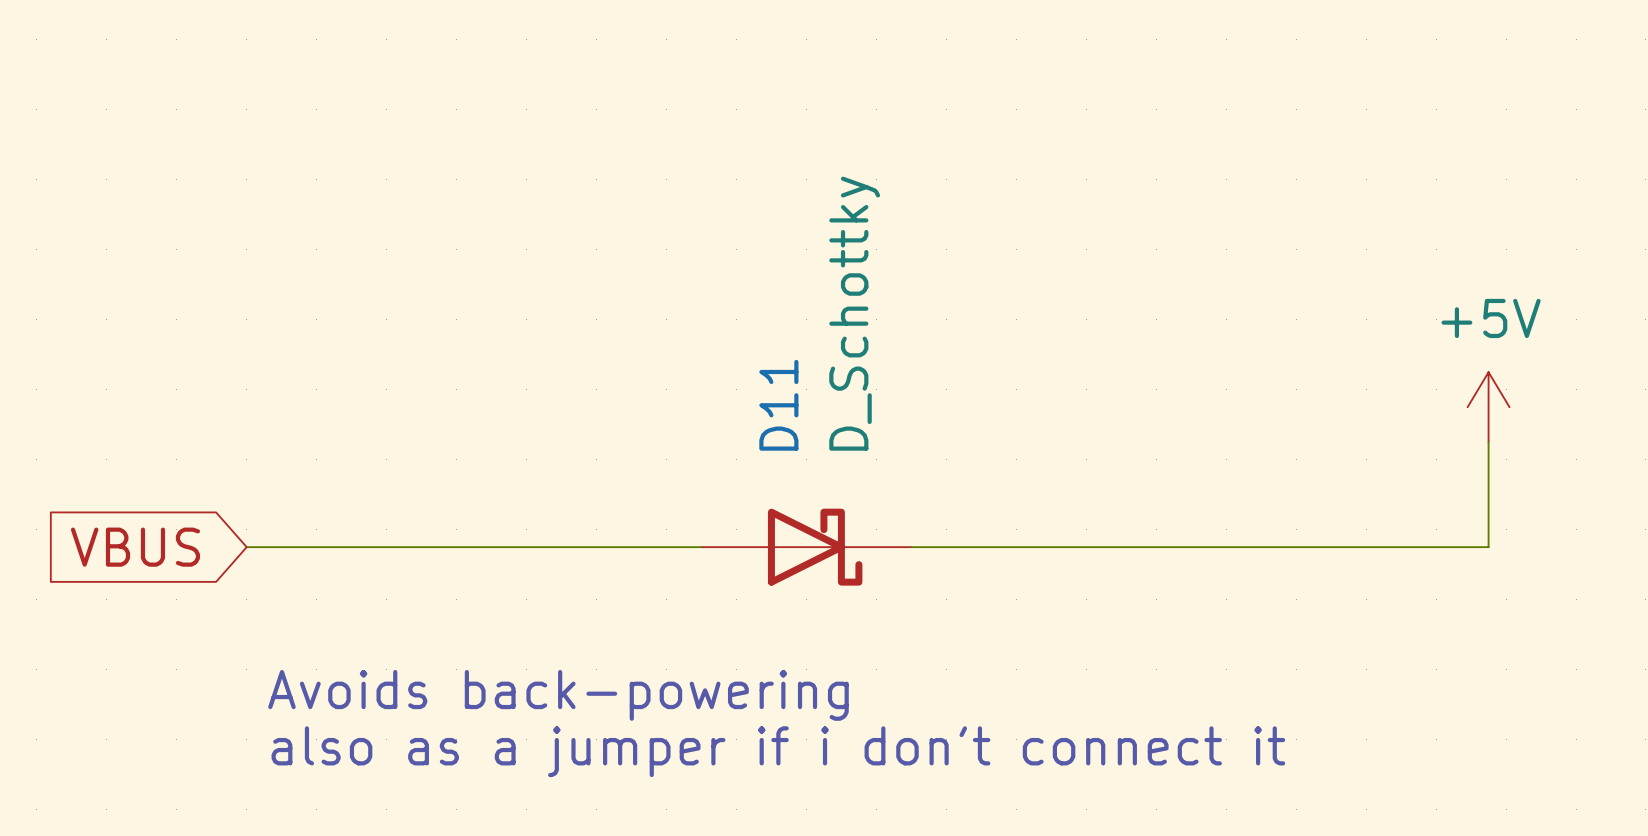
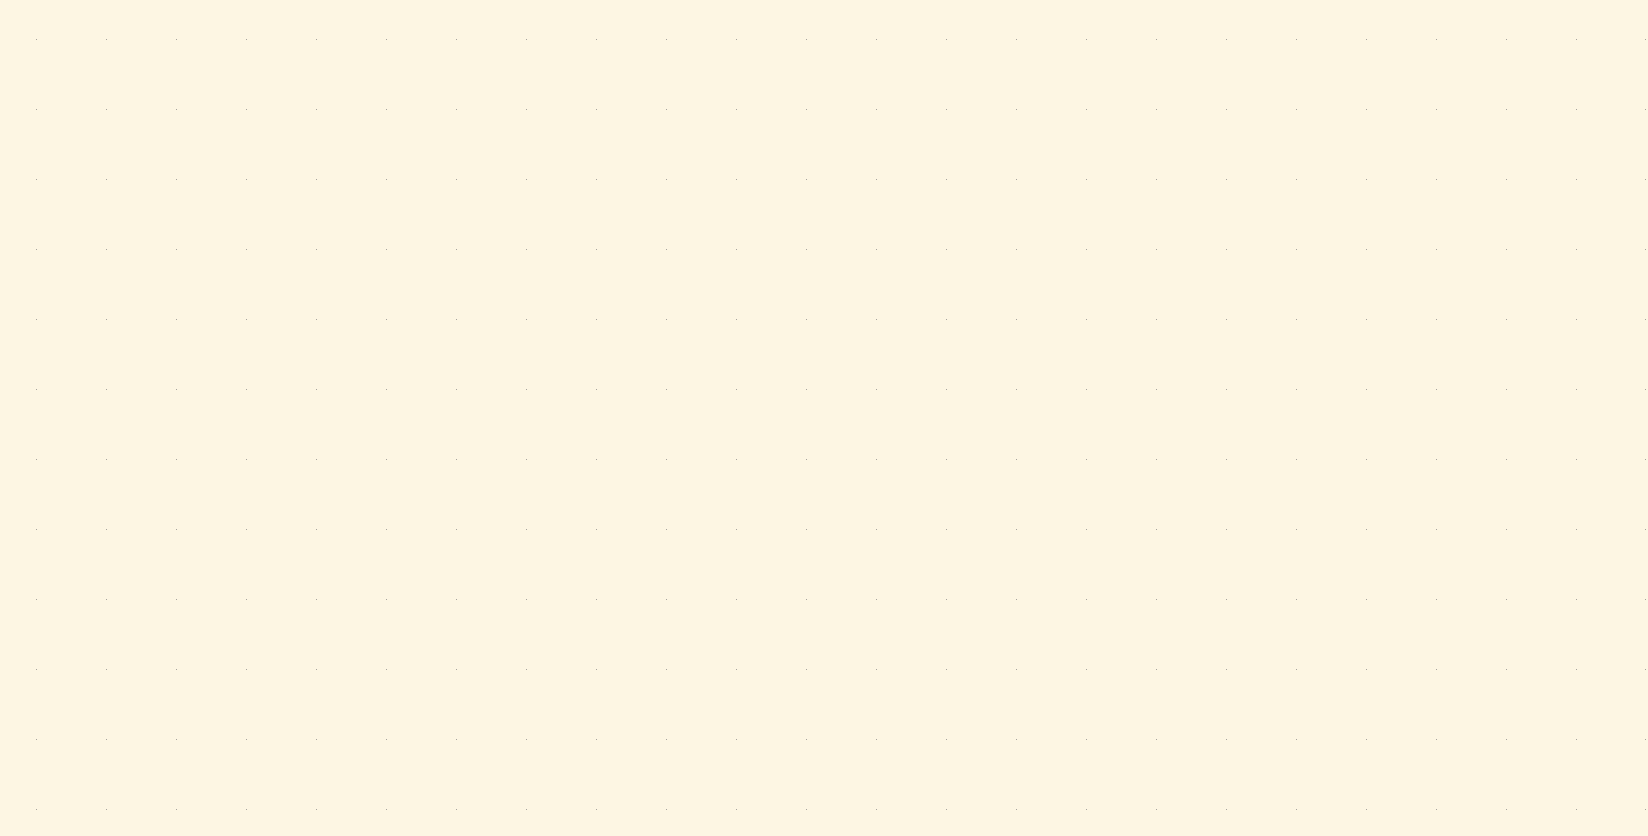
power symbol: +5V (1488, 407) -> none
wire: (1488, 442) (1488, 547) (911, 547) -> none
global label: VBUS (135, 547) -> none
wire: (246, 547) (701, 547) -> none
D11: D_Schottky (806, 547) -> none
text: Avoids back-powering (558, 695) -> none
text: also as a jumper if i don't connect it (778, 751) -> none

